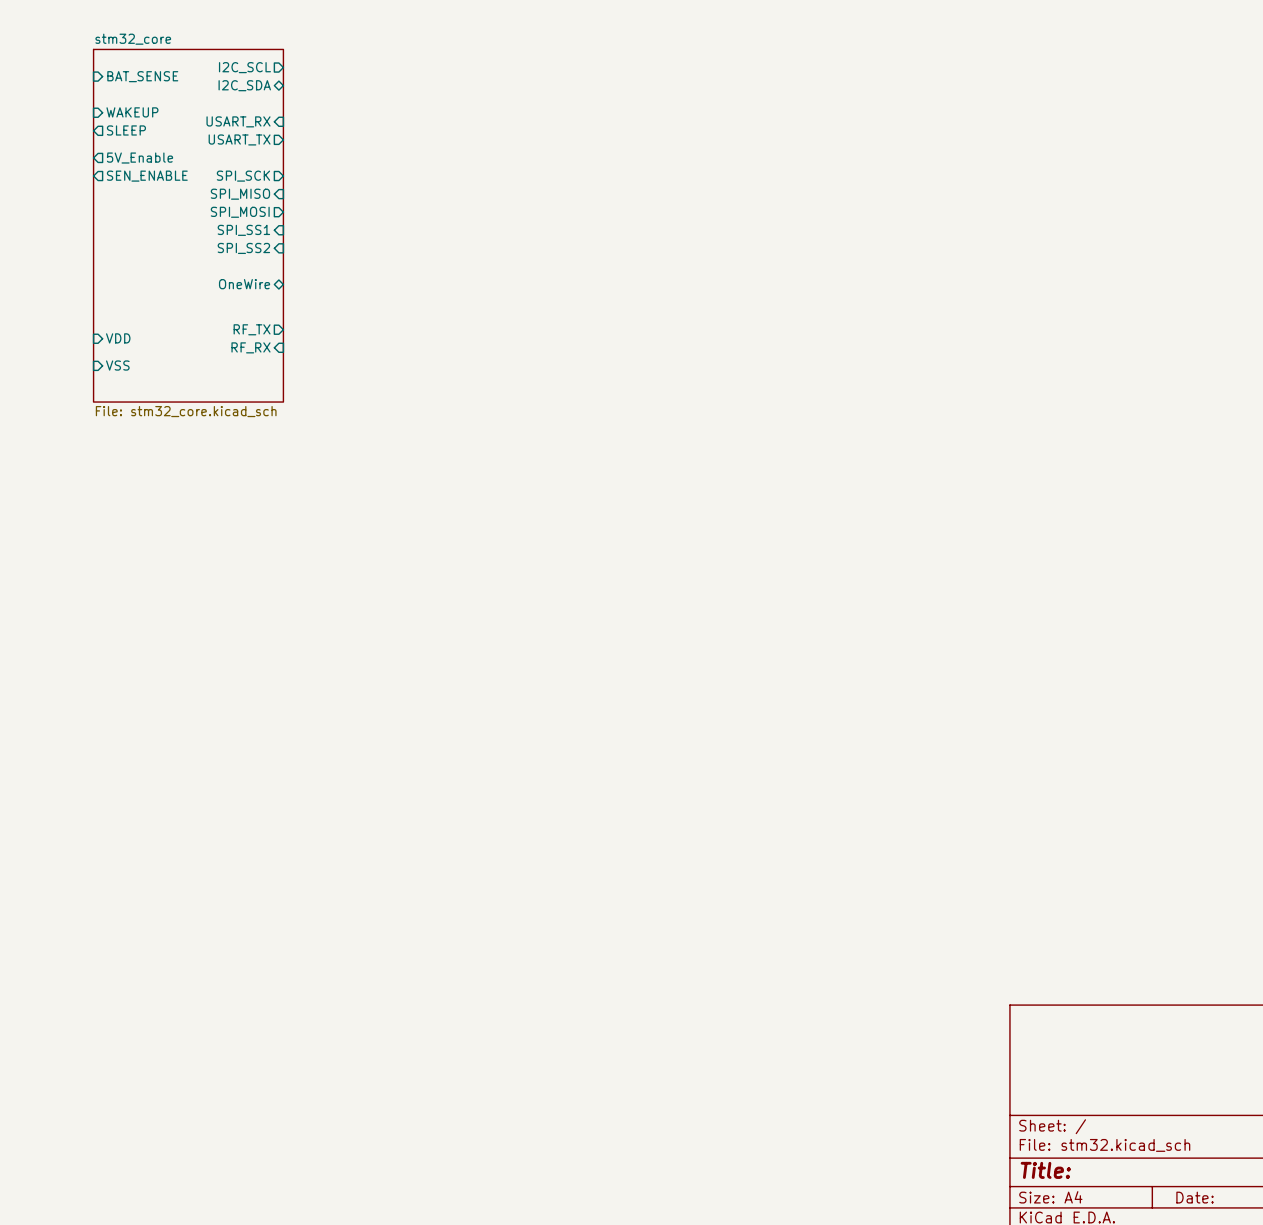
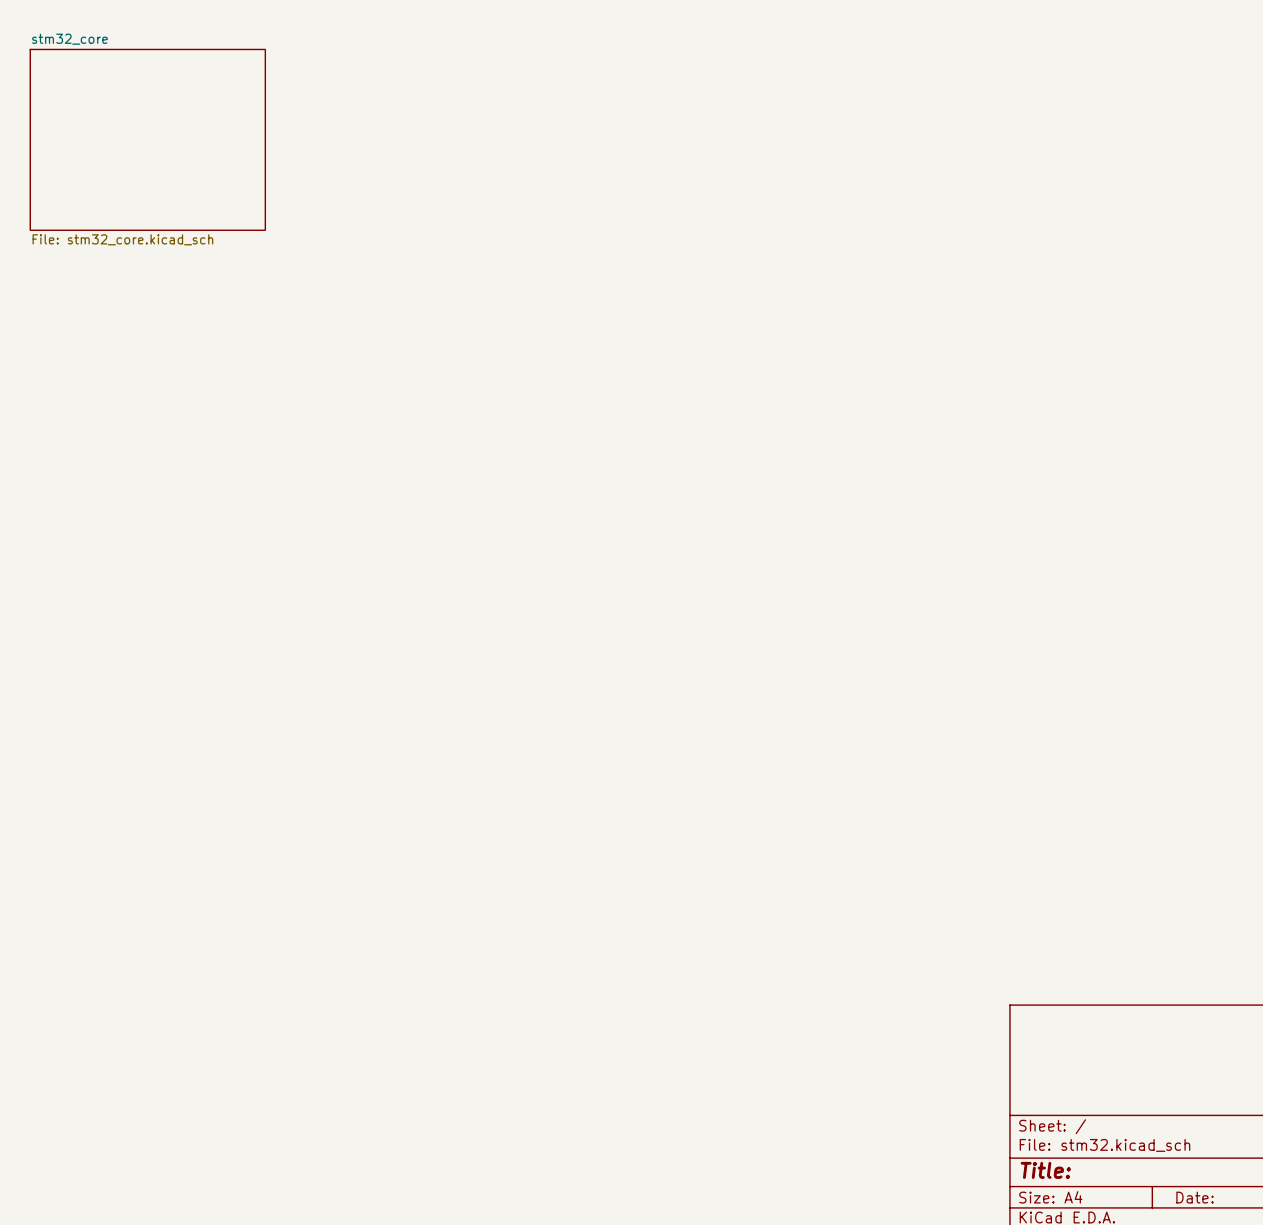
sheet stm32_core name position: stm32_core (133, 39) -> stm32_core (69, 39)
sheet stm32_core shape: [93, 48, 284, 403] -> [29, 48, 266, 231]
sheet pin: I2C_SCL (244, 67) -> none
sheet pin: BAT_SENSE (142, 76) -> none
sheet pin: I2C_SDA (244, 85) -> none
sheet pin: WAKEUP (132, 112) -> none
sheet pin: USART_RX (238, 121) -> none
sheet pin: SLEEP (126, 130) -> none
sheet pin: USART_TX (239, 139) -> none
sheet pin: 5V_Enable (139, 158) -> none
sheet pin: SEN_ENABLE (147, 176) -> none
sheet pin: SPI_SCK (243, 176) -> none
sheet pin: SPI_MISO (240, 194) -> none
sheet pin: SPI_MOSI (240, 212) -> none
sheet pin: SPI_SS1 (243, 230) -> none
sheet pin: SPI_SS2 (243, 248) -> none
sheet pin: OneWire (244, 284) -> none
sheet pin: RF_TX (252, 329) -> none
sheet pin: VDD (118, 338) -> none
sheet pin: RF_RX (250, 347) -> none
sheet pin: VSS (117, 365) -> none
sheet stm32_core value position: File: stm32_core.kicad_sch (186, 411) -> File: stm32_core.kicad_sch (122, 239)

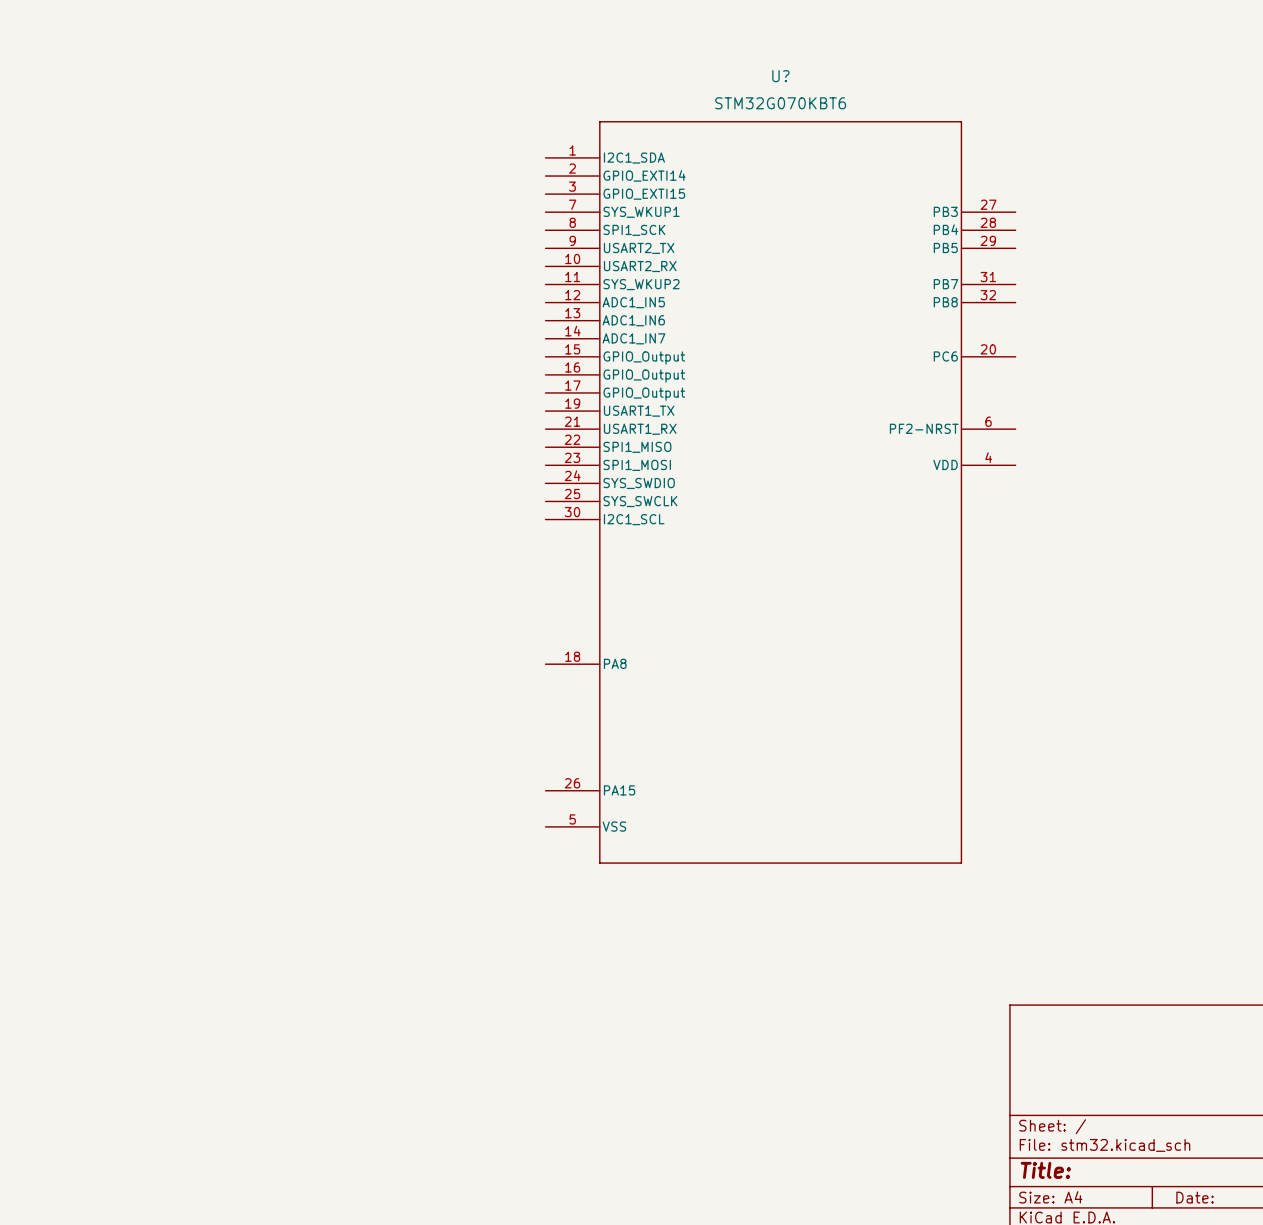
sheet stm32_core: File: stm32_core.kicad_sch (147, 139) -> none
U?: none -> STM32G070KBT6 (780, 492)

